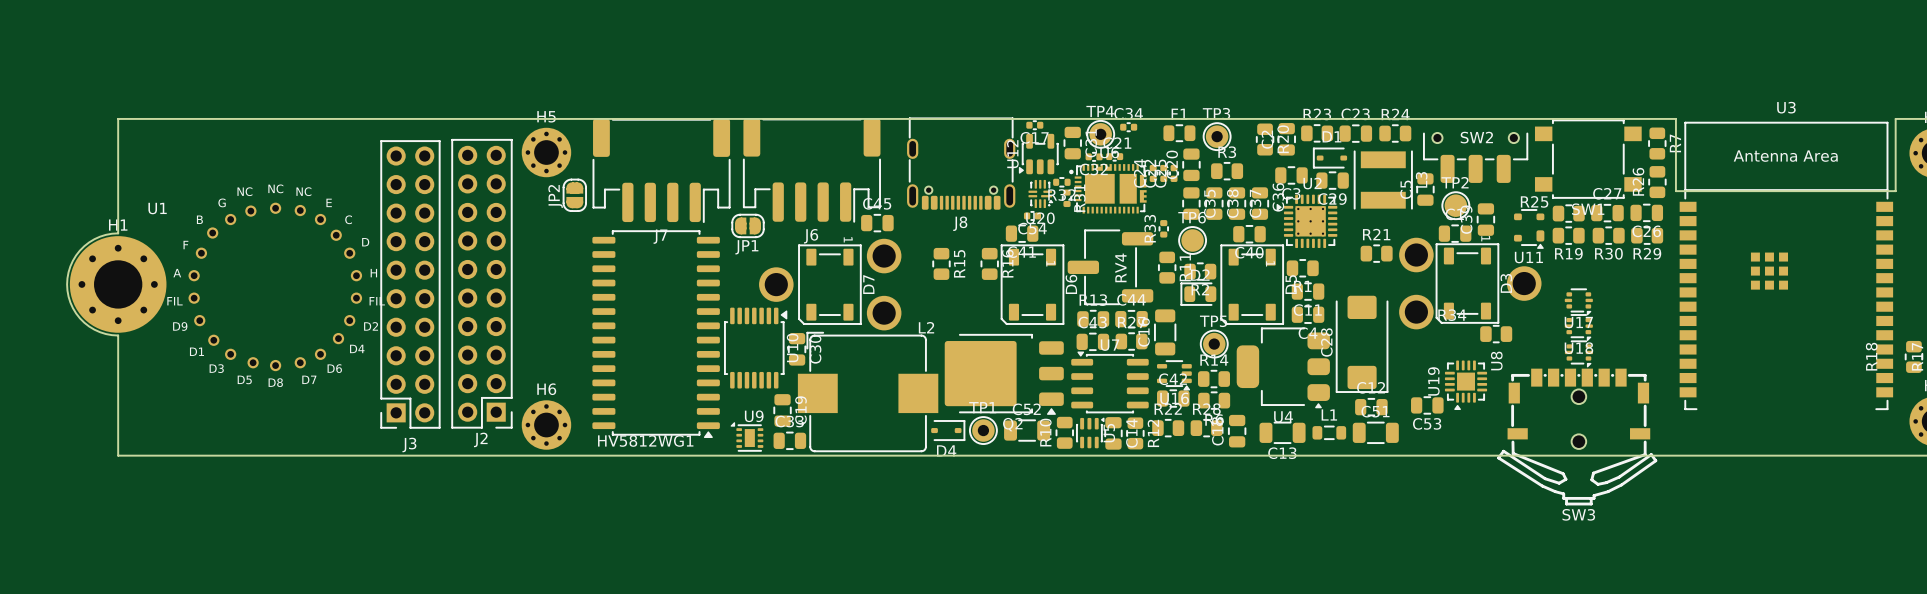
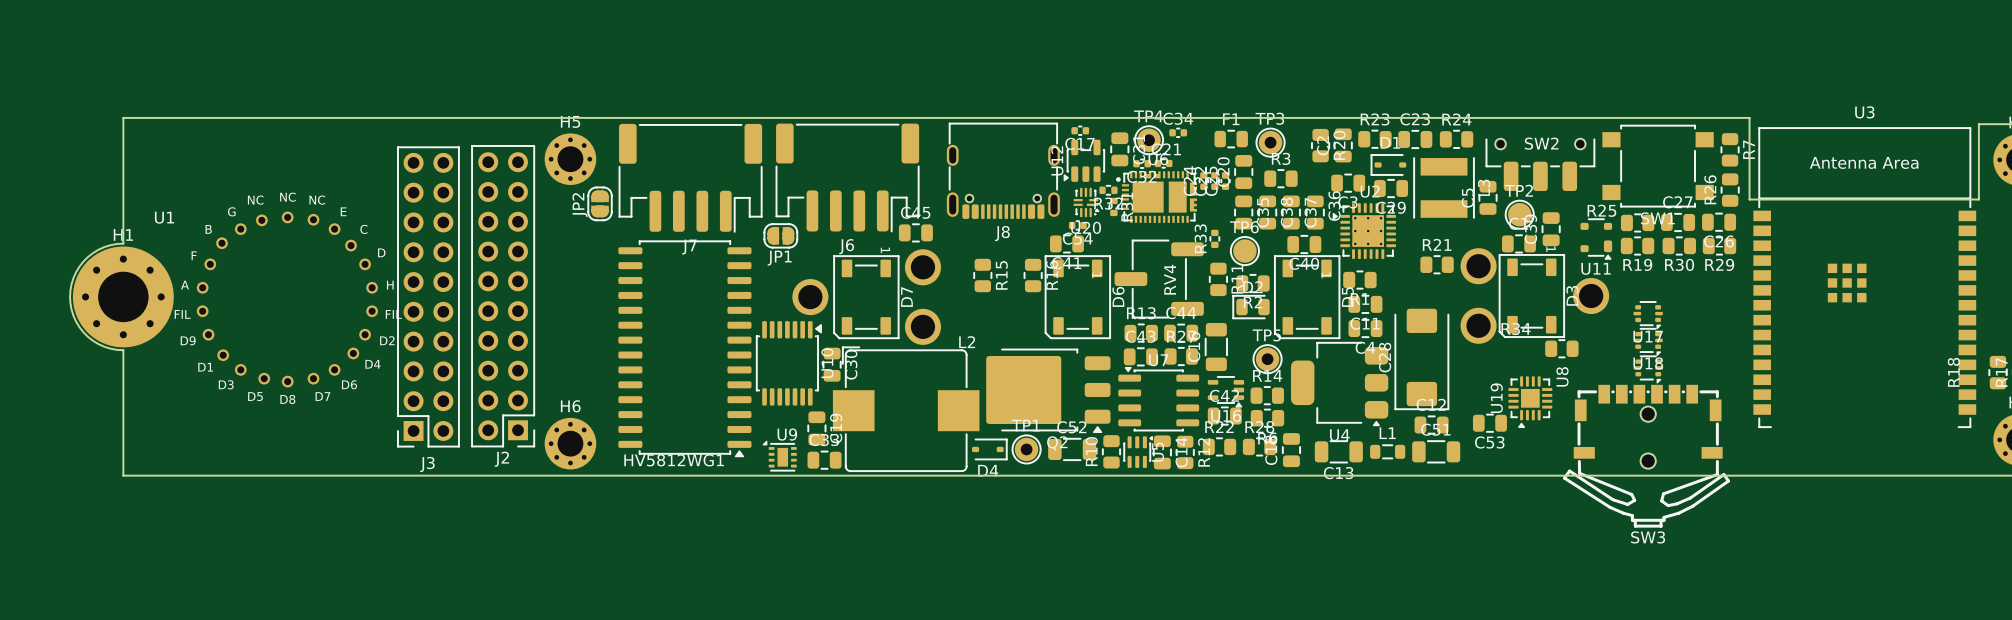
board edge: none -> (123, 117) (1749, 117)
board edge: none -> (1749, 117) (1749, 124)
board edge: (118, 118) (1675, 118) -> (123, 124) (123, 117)

